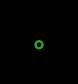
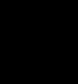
via: (39, 44) -> none

